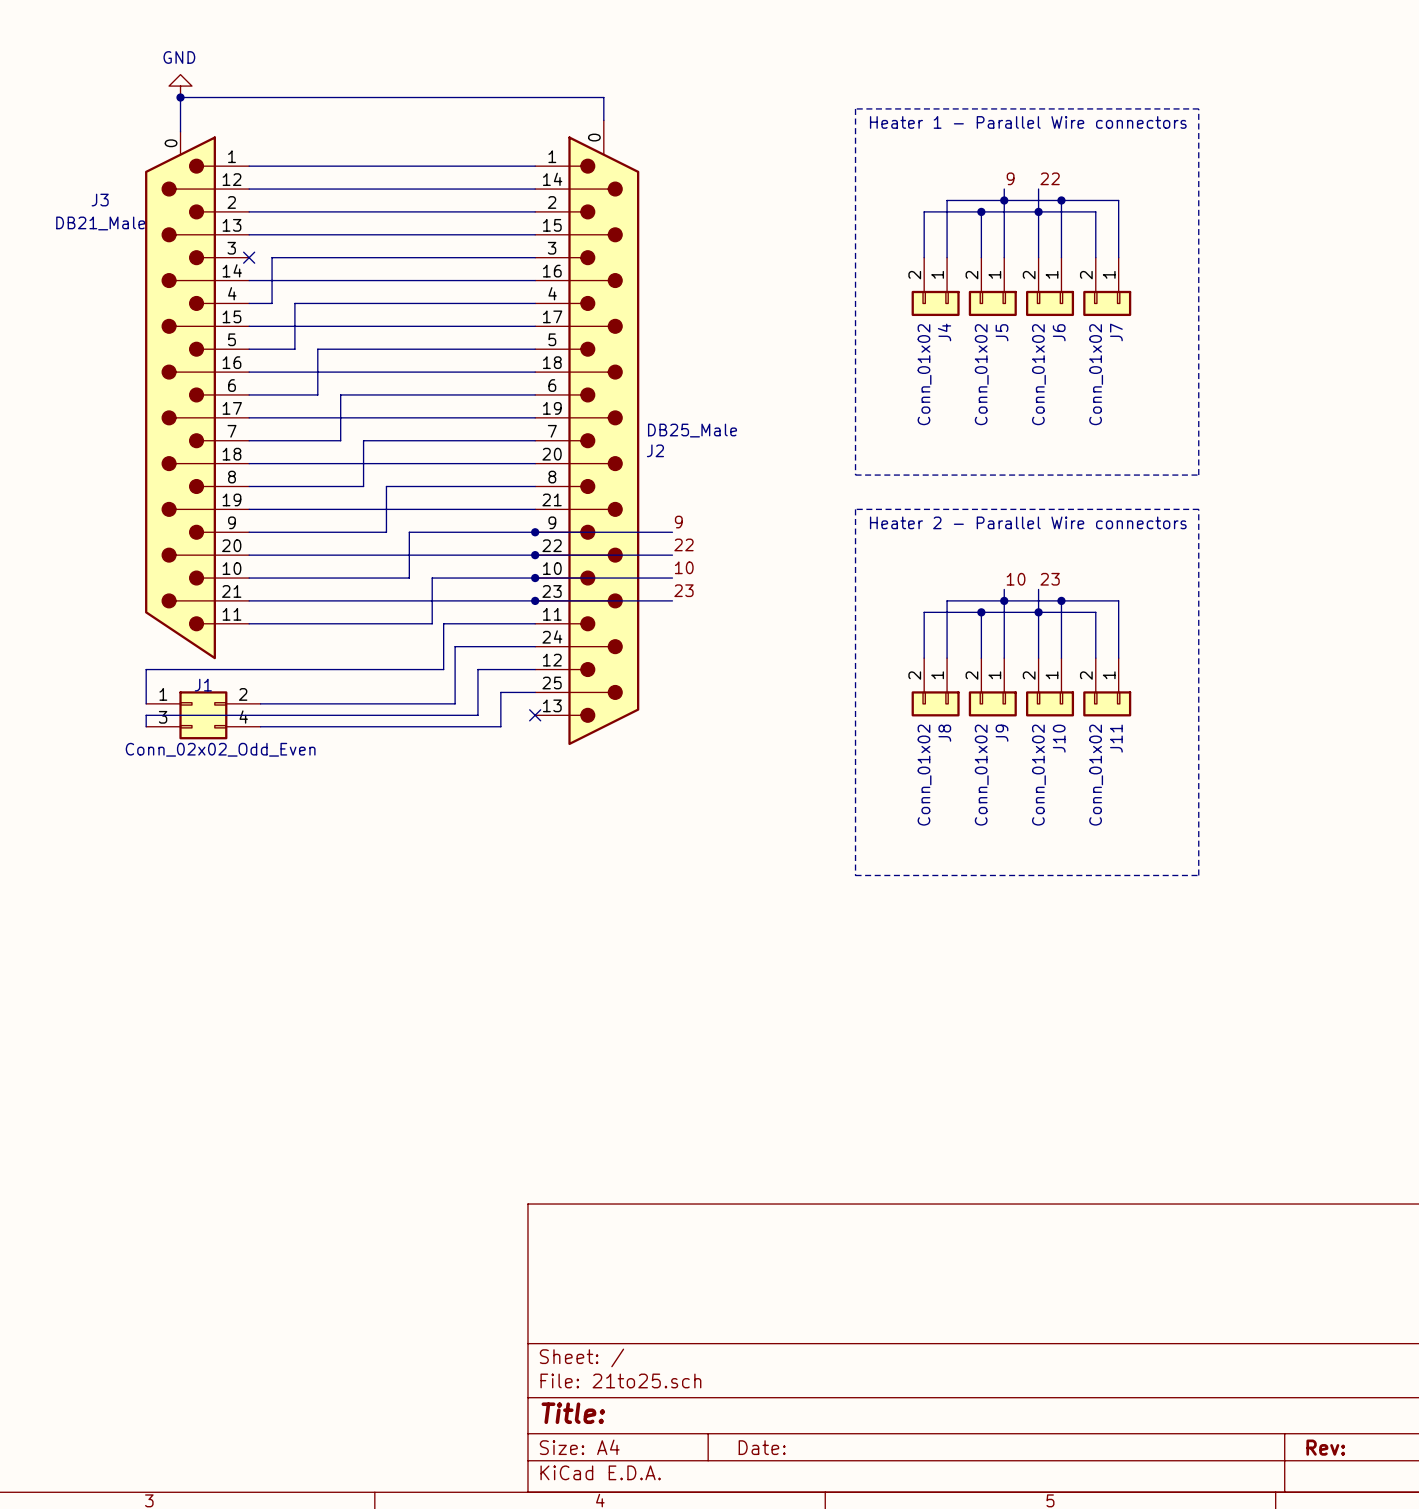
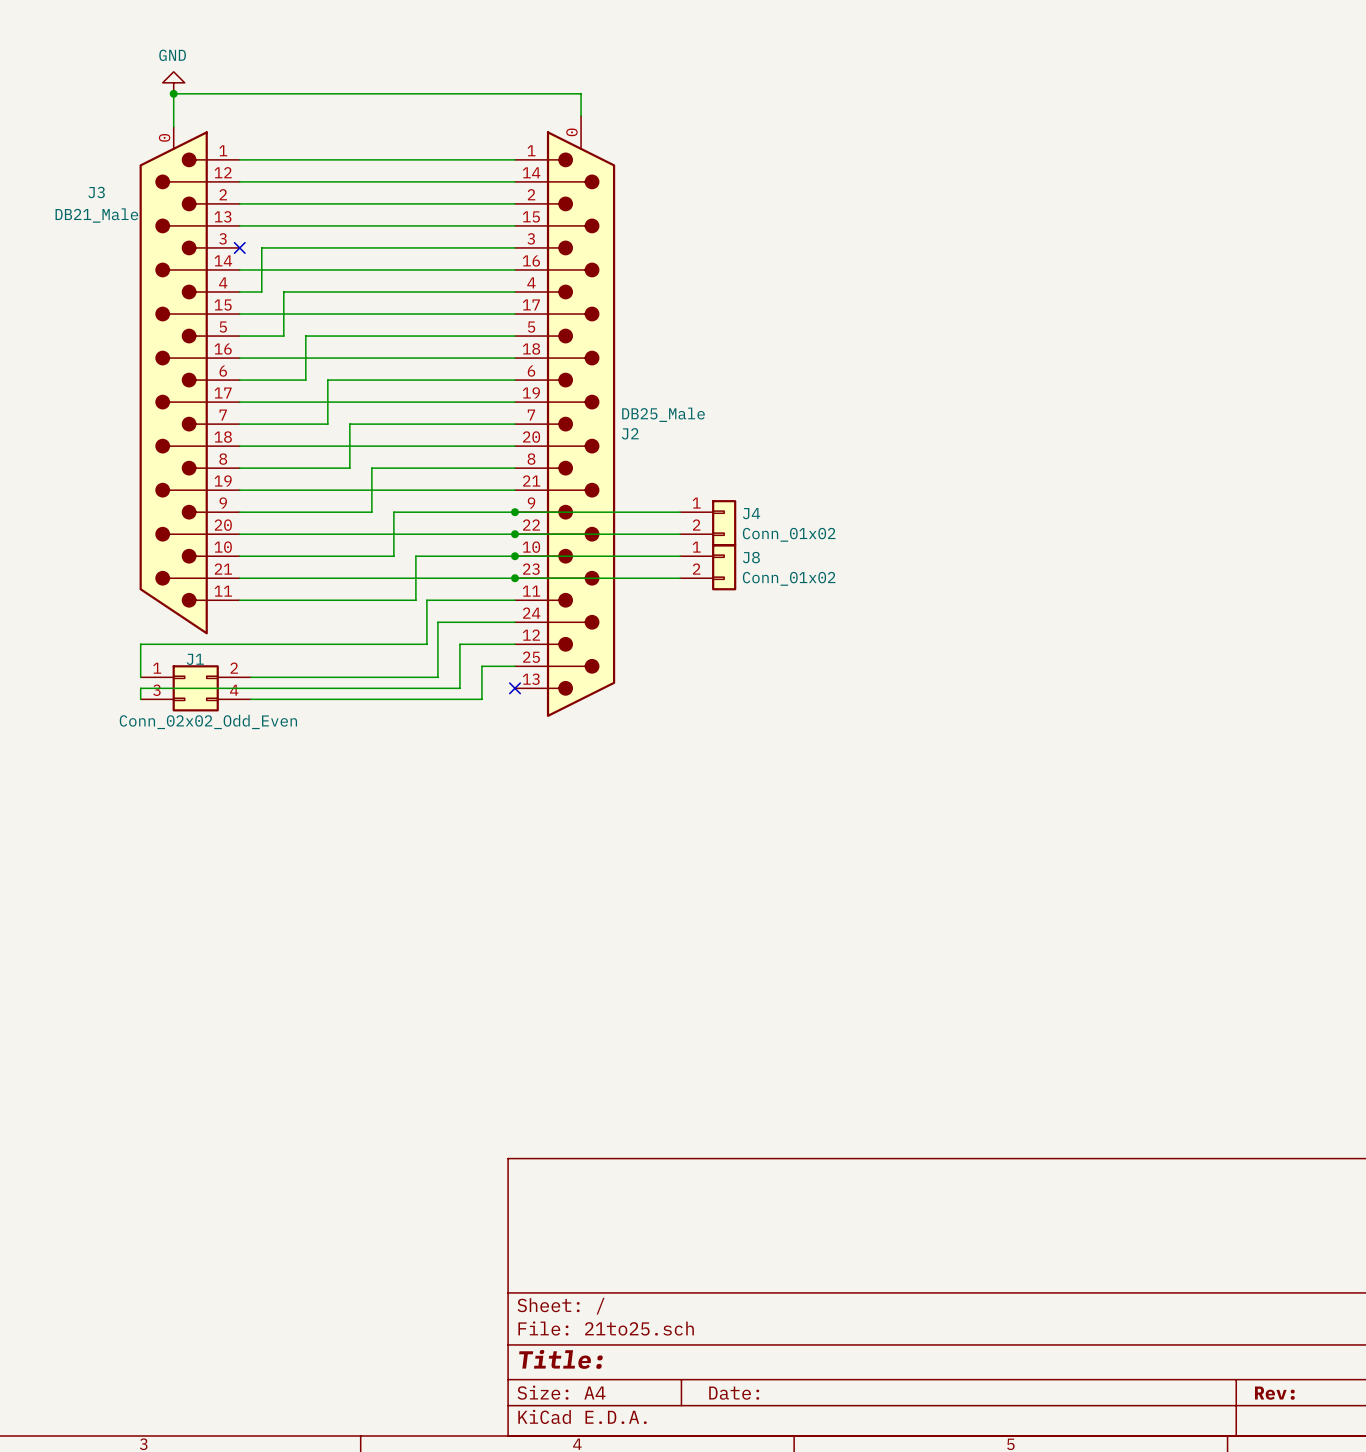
line: (855, 108) (1198, 108) (1198, 475) (855, 475) (855, 108) -> none
text: Heater 1 - Parallel Wire connectors (1028, 122) -> none
label: 9 (1010, 178) -> none
label: 22 (1050, 178) -> none
wire: (1004, 189) (1004, 257) -> none
wire: (1038, 189) (1038, 257) -> none
junction: (1004, 200) -> none
wire: (1061, 200) (1061, 257) -> none
junction: (1061, 200) -> none
wire: (981, 211) (981, 257) -> none
junction: (981, 211) -> none
junction: (1038, 211) -> none
wire: (924, 257) (924, 211) (1095, 211) (1095, 257) -> none
wire: (947, 257) (947, 200) (1118, 200) (1118, 257) -> none
J4 position: (935, 286) -> (708, 523)
J5: Conn_01x02 (992, 286) -> none
J6: Conn_01x02 (1050, 286) -> none
J7: Conn_01x02 (1107, 286) -> none
J4 rotation: 0° (935, 303) -> 90° counterclockwise (724, 523)
line: (855, 509) (855, 875) (1198, 875) (1198, 509) (855, 509) -> none
label: 9 (678, 522) -> none
text: Heater 2 - Parallel Wire connectors (1028, 522) -> none
wire: none -> (647, 512) (680, 512)
label: 22 (683, 544) -> none
wire: none -> (647, 534) (680, 534)
label: 10 (684, 567) -> none
wire: none -> (647, 556) (680, 556)
label: 10 (1016, 579) -> none
label: 23 (1050, 579) -> none
wire: (1004, 589) (1004, 658) -> none
wire: (1038, 589) (1038, 658) -> none
label: 23 (683, 590) -> none
wire: none -> (647, 578) (680, 578)
junction: (1004, 600) -> none
wire: (1061, 600) (1061, 658) -> none
junction: (1061, 600) -> none
wire: (981, 612) (981, 658) -> none
junction: (981, 612) -> none
junction: (1038, 612) -> none
wire: (924, 658) (924, 612) (1095, 612) (1095, 658) -> none
wire: (947, 658) (947, 600) (1118, 600) (1118, 658) -> none
J8 position: (935, 687) -> (708, 567)
J9: Conn_01x02 (992, 687) -> none
J10: Conn_01x02 (1050, 687) -> none
J11: Conn_01x02 (1107, 687) -> none
J8 rotation: 0° (935, 703) -> 90° counterclockwise (724, 567)

